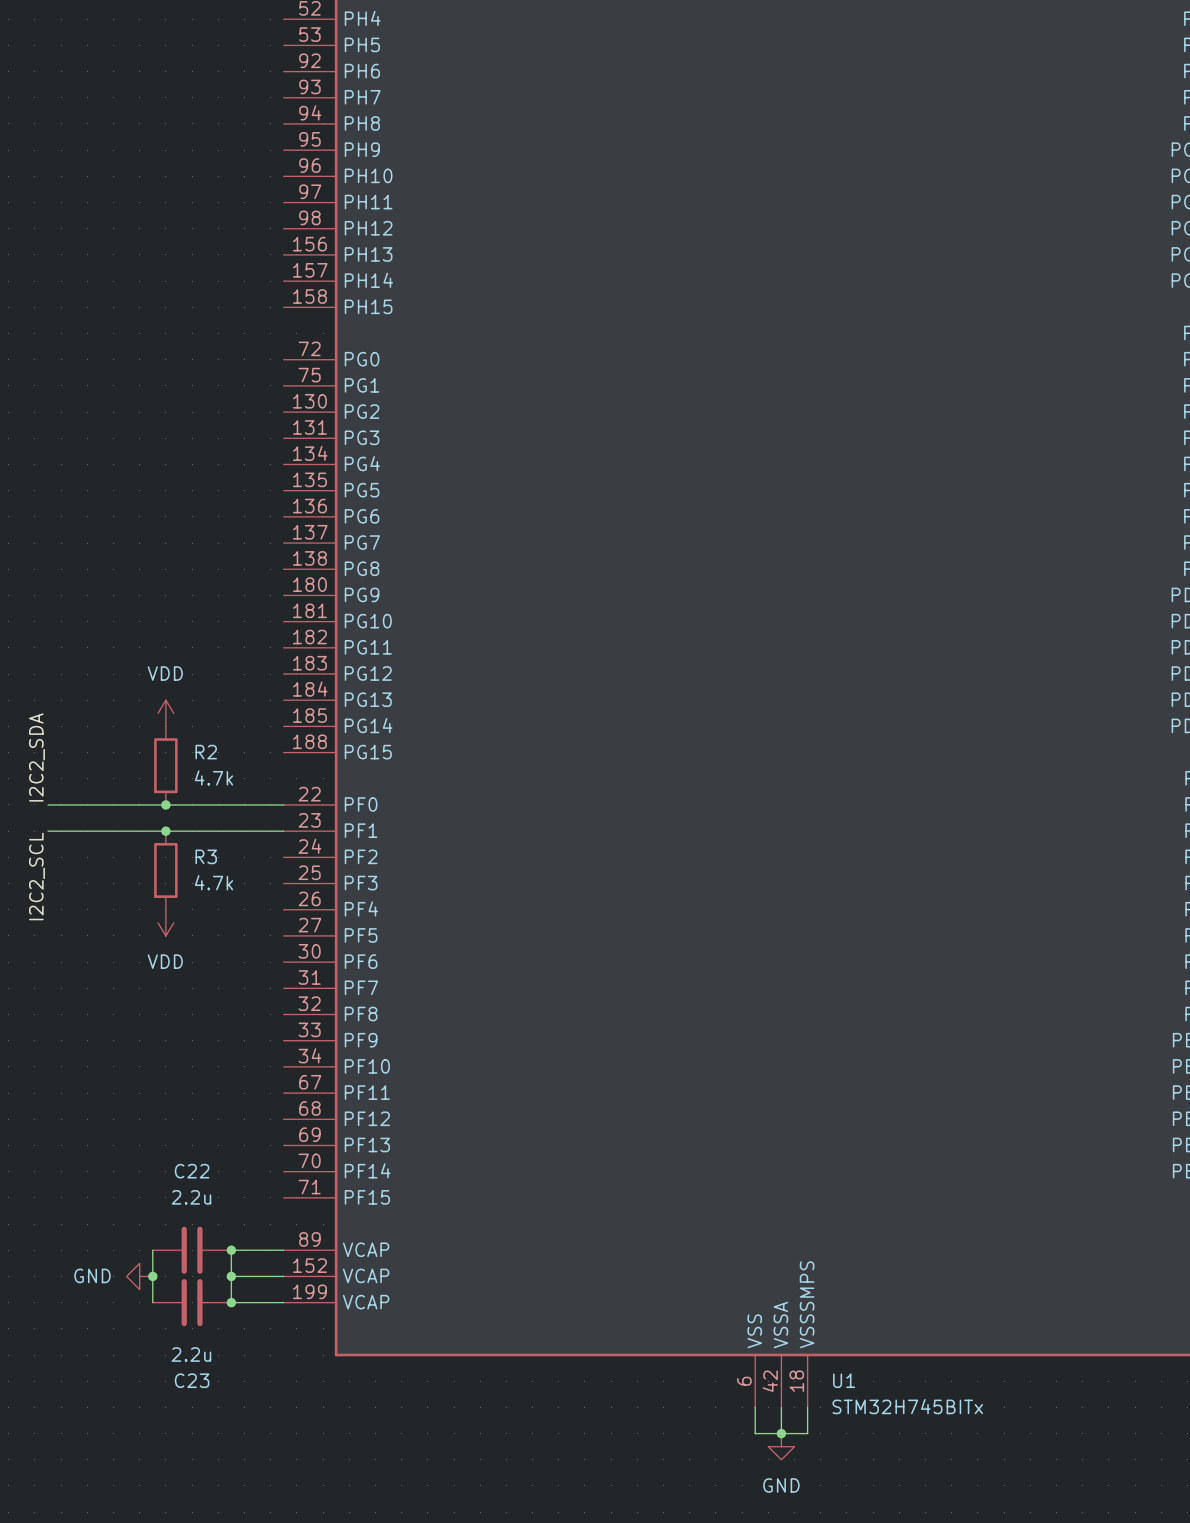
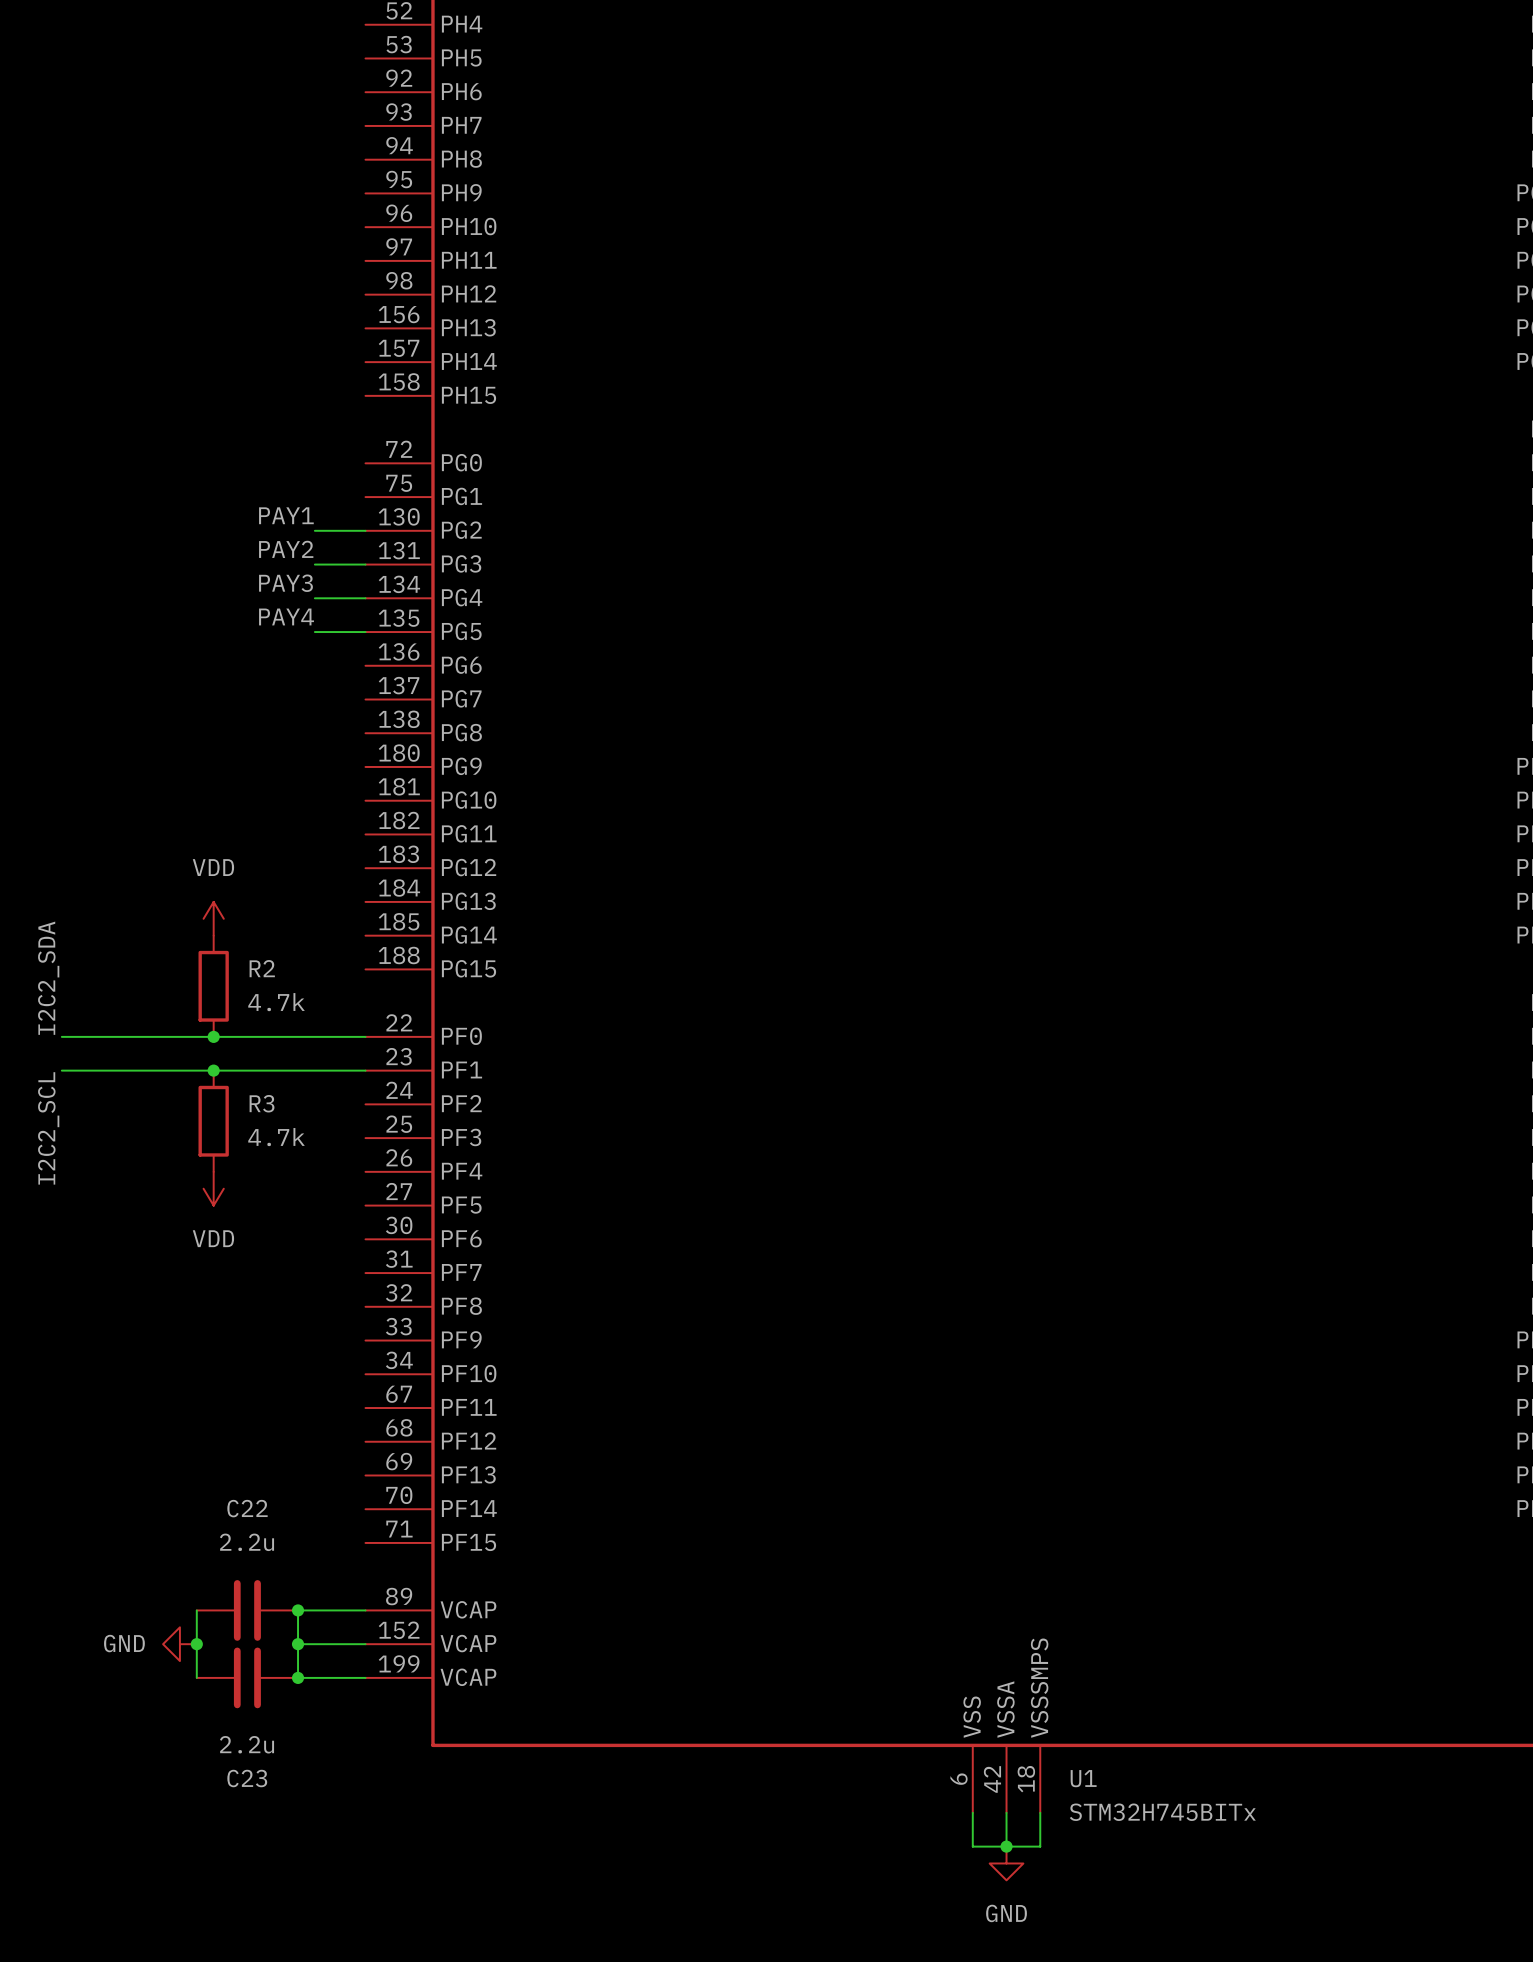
label: none -> PAY1 (286, 515)
wire: none -> (314, 530) (365, 530)
label: none -> PAY2 (286, 549)
wire: none -> (314, 564) (365, 564)
label: none -> PAY3 (285, 583)
wire: none -> (314, 598) (365, 598)
label: none -> PAY4 (286, 616)
wire: none -> (314, 632) (365, 632)

